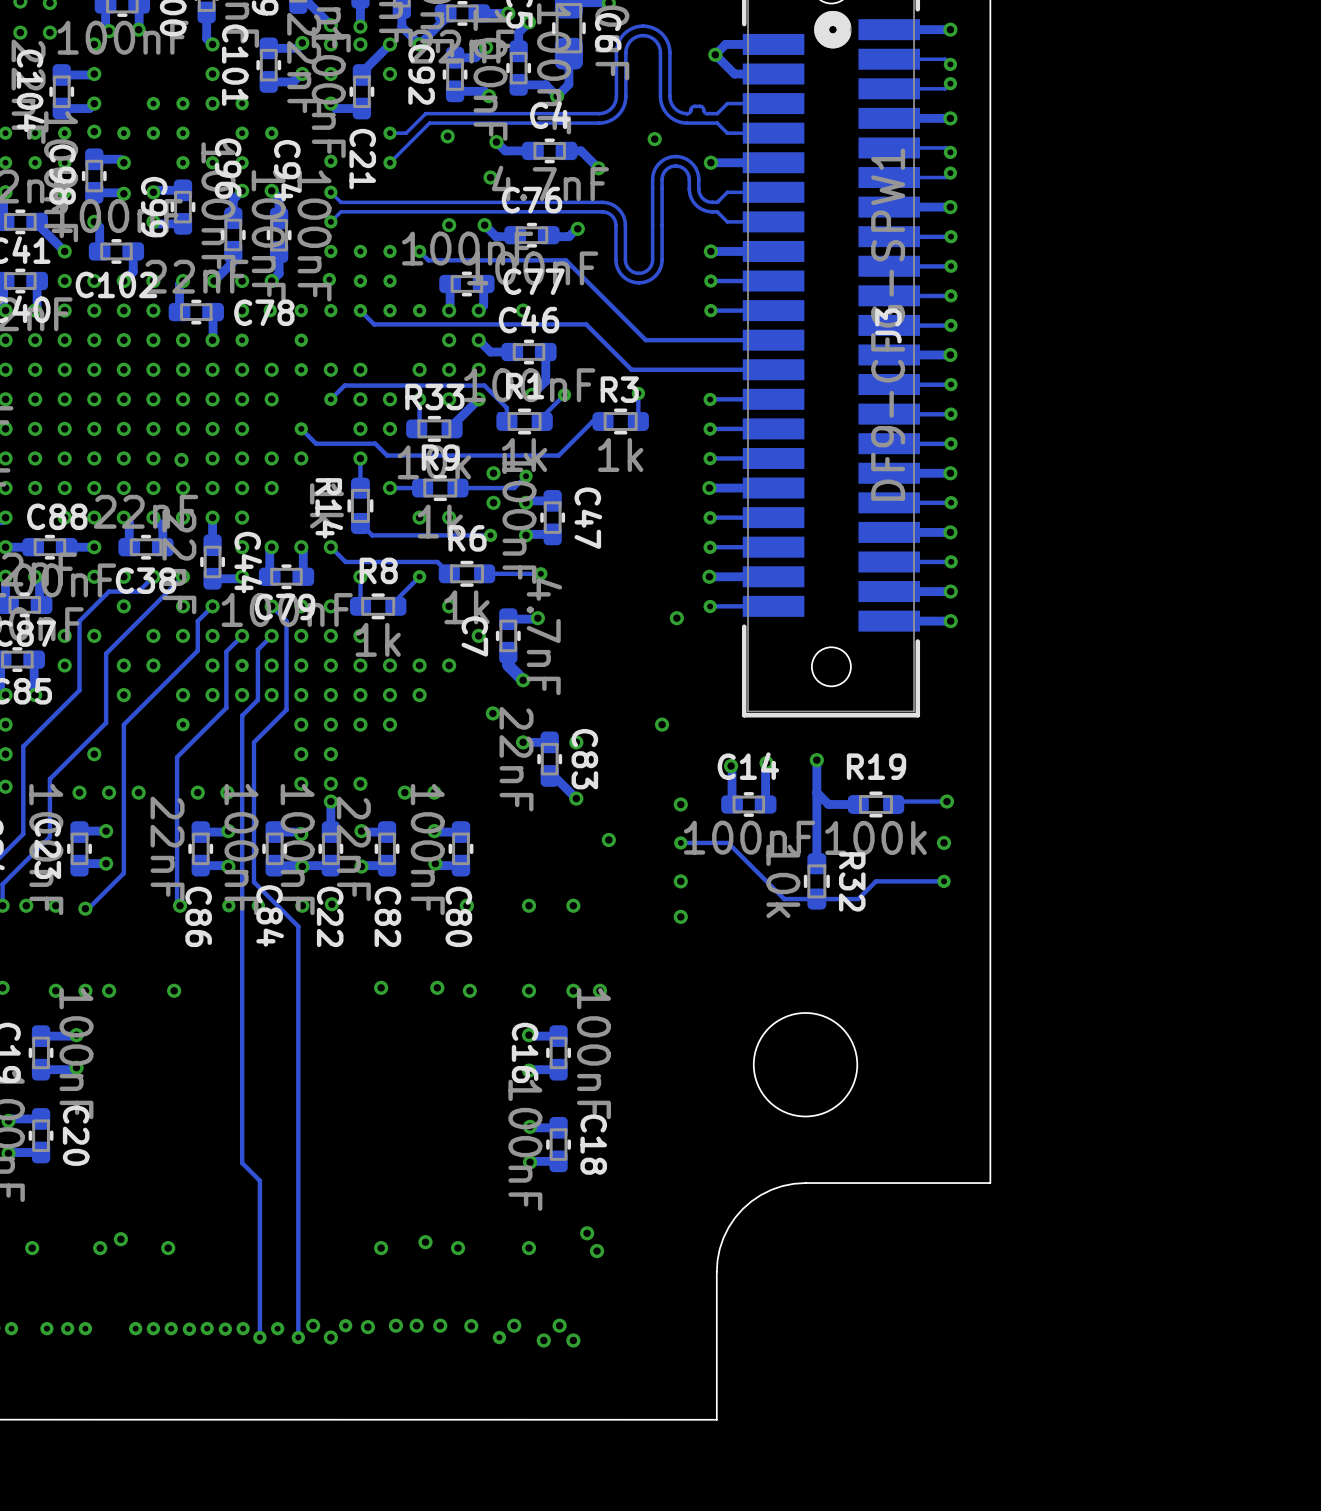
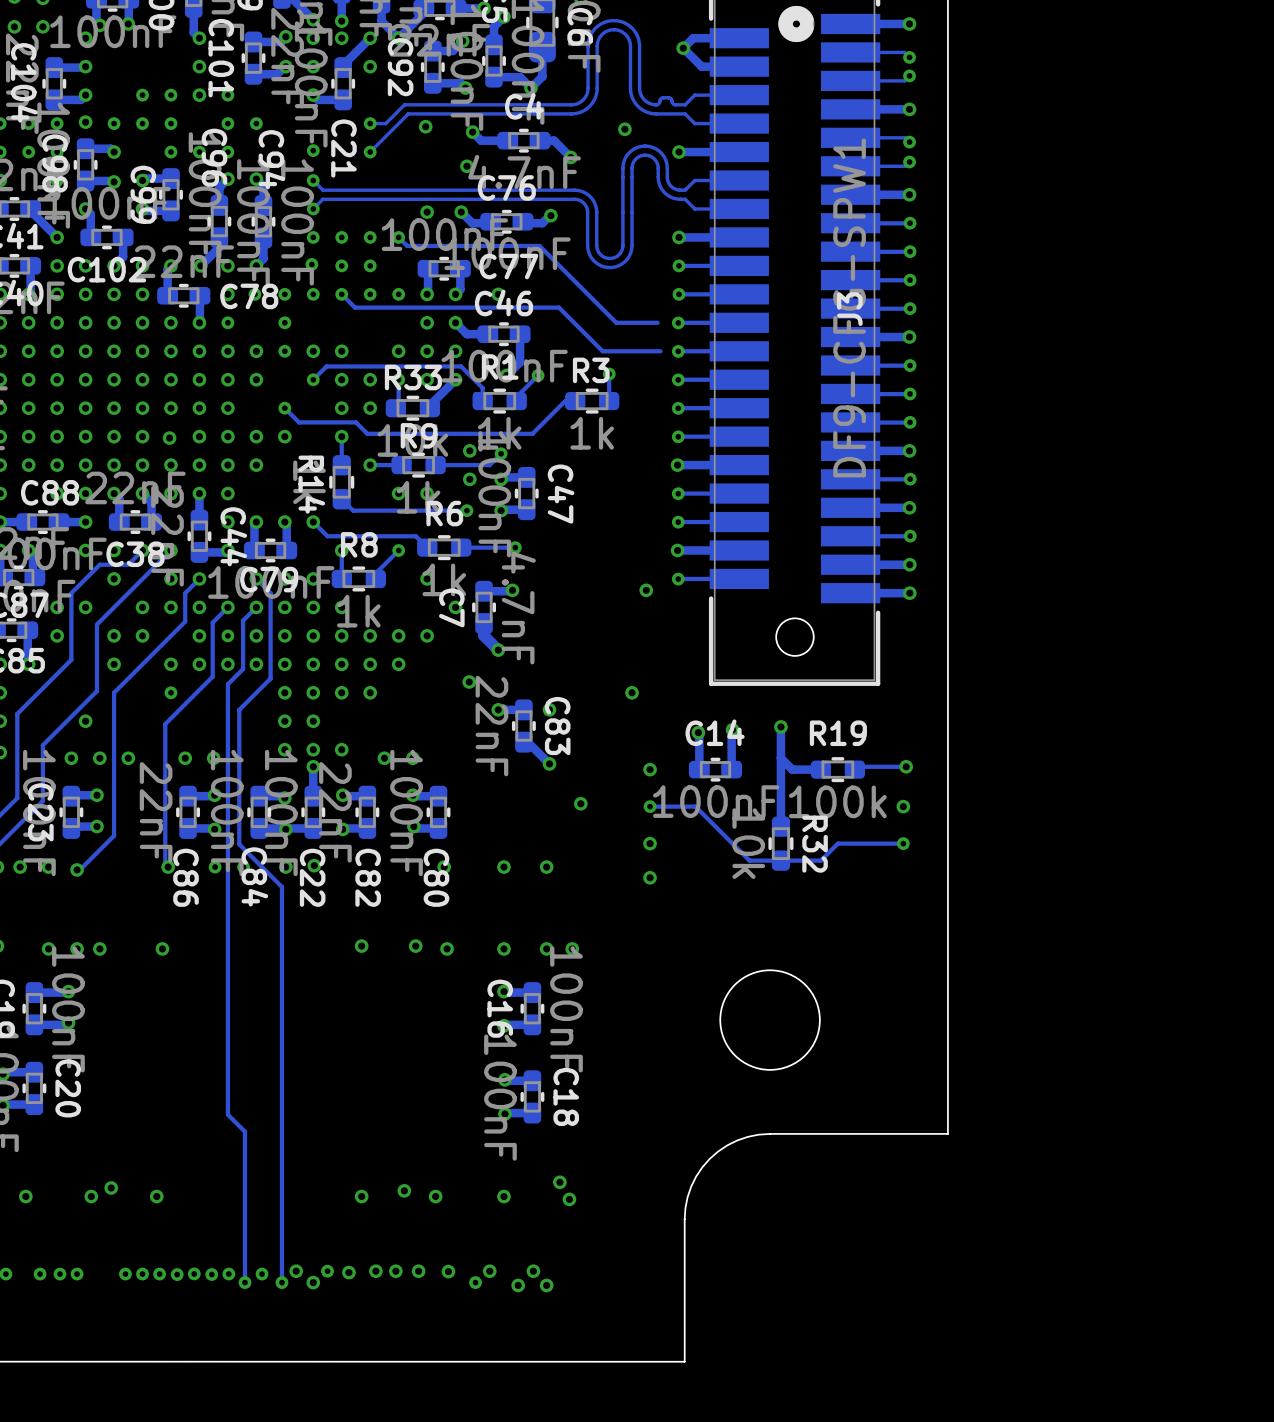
track: (710, 340) (688, 340) -> none
via: none -> (678, 322)
track: (710, 369) (691, 369) -> none
via: none -> (678, 351)

